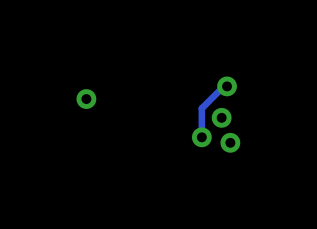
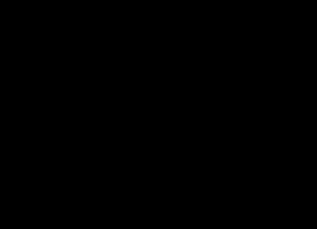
track: (226, 86) (223, 86) (201, 108) (201, 137) -> none
via: (227, 86) -> none
via: (86, 99) -> none
via: (221, 117) -> none
via: (201, 137) -> none
via: (230, 142) -> none

